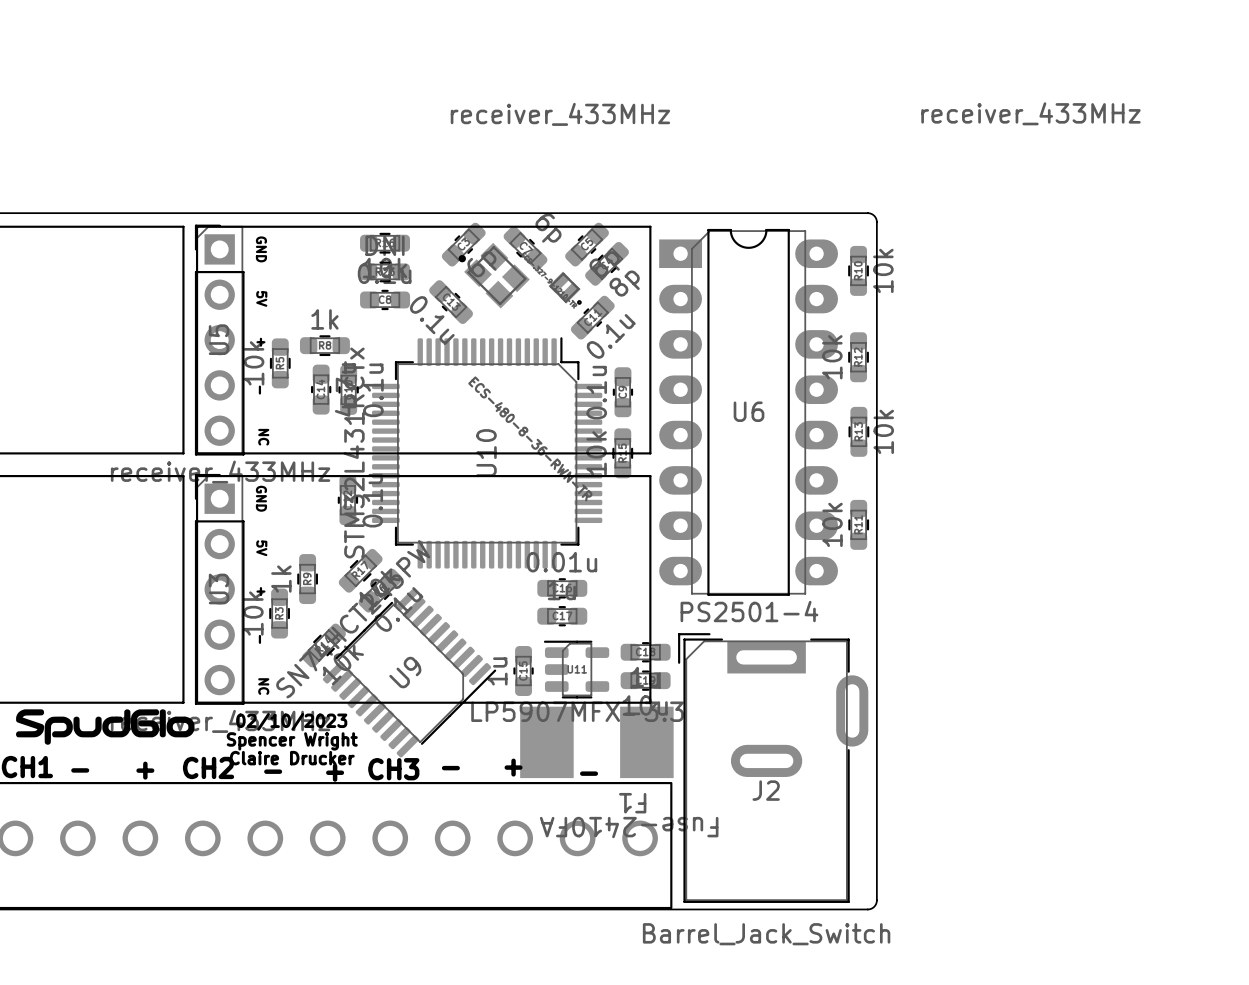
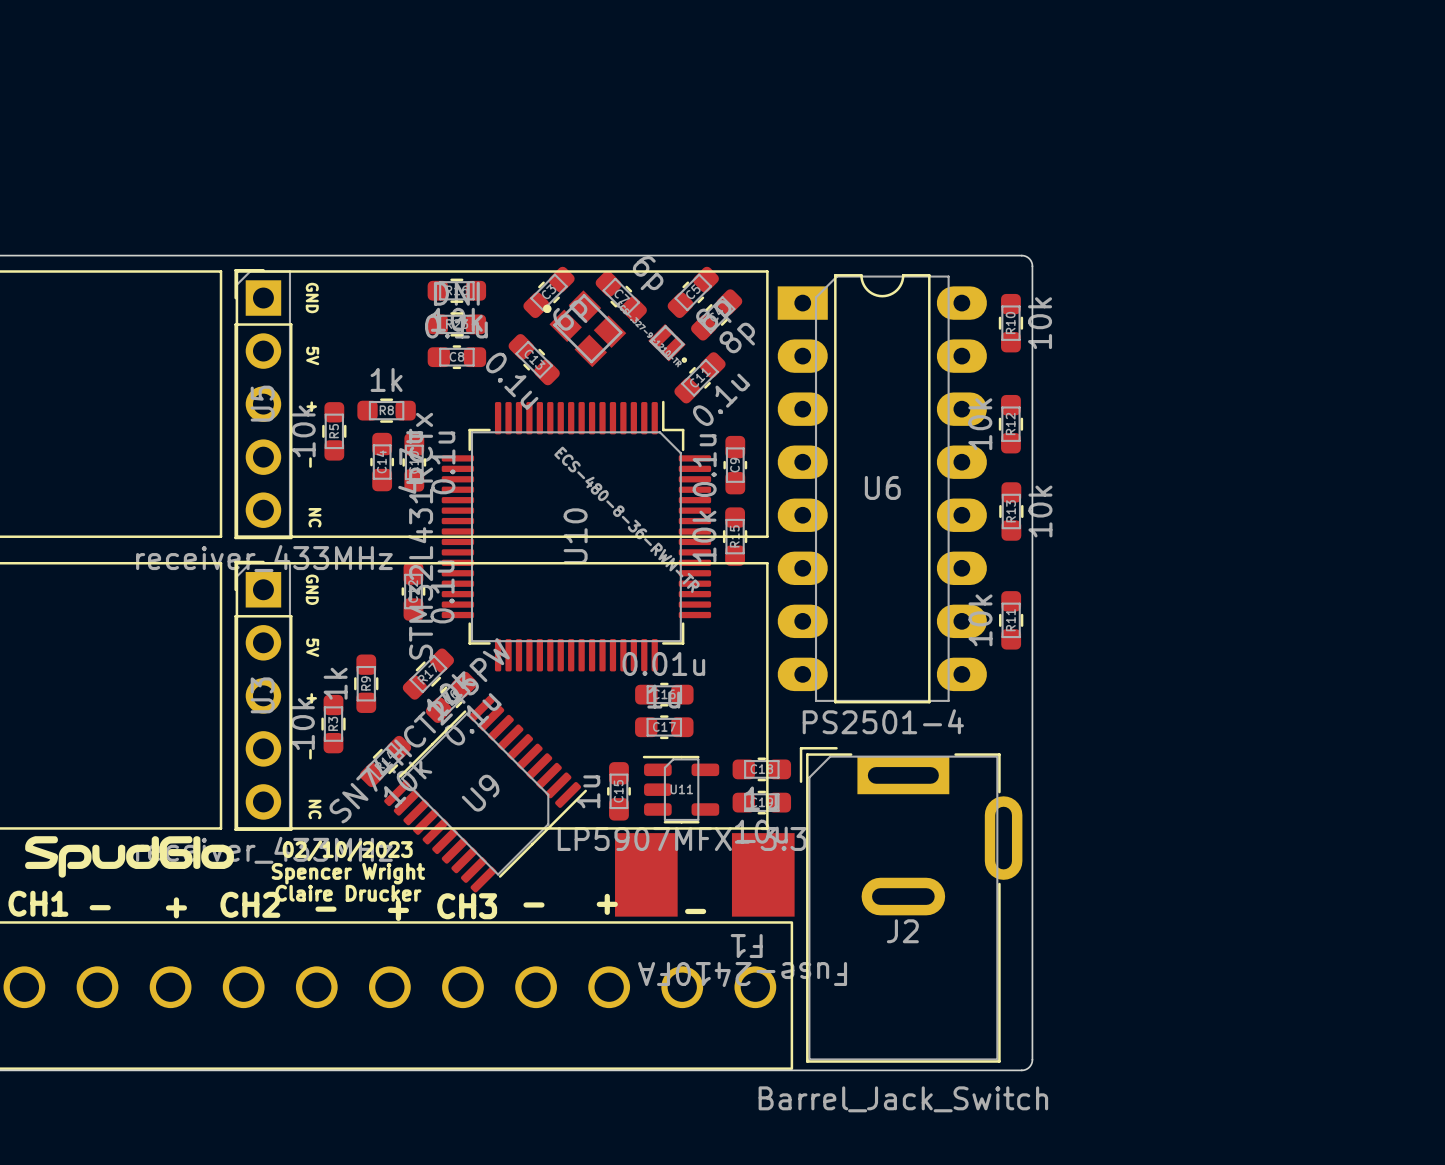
text: receiver_433MHz (1030, 113) -> none
text: receiver_433MHz (560, 114) -> none

